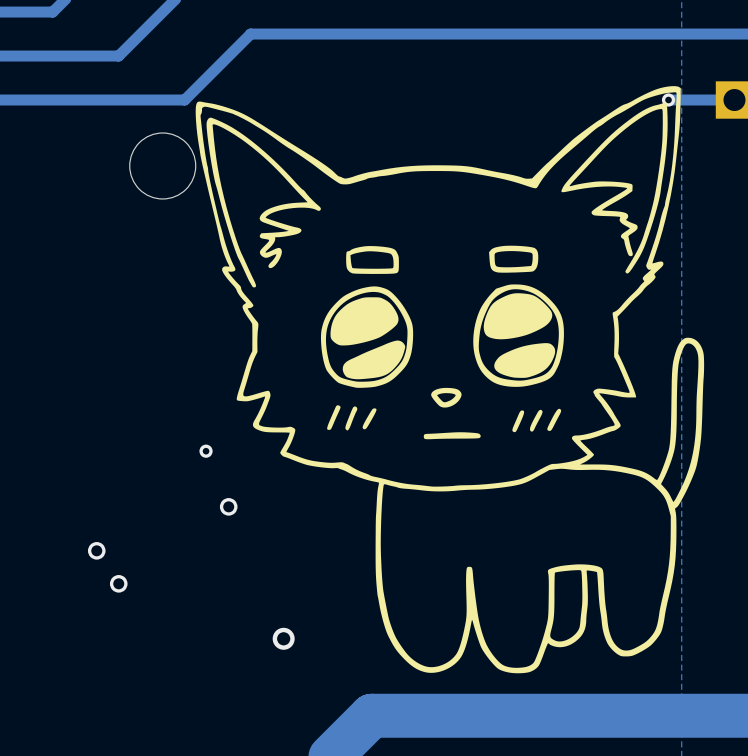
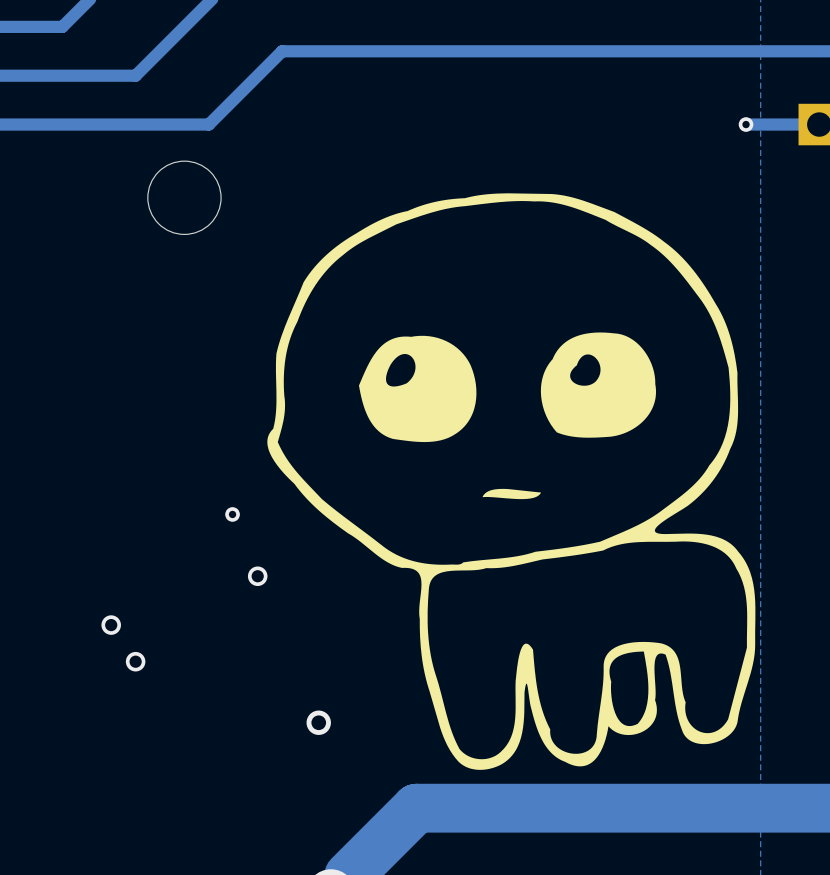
drawing: [195, 86, 705, 674] -> none
drawing: none -> [267, 193, 756, 770]
drawing shape: [320, 286, 414, 388] -> [358, 335, 477, 443]
drawing shape: [423, 432, 481, 440] -> [482, 488, 542, 500]

